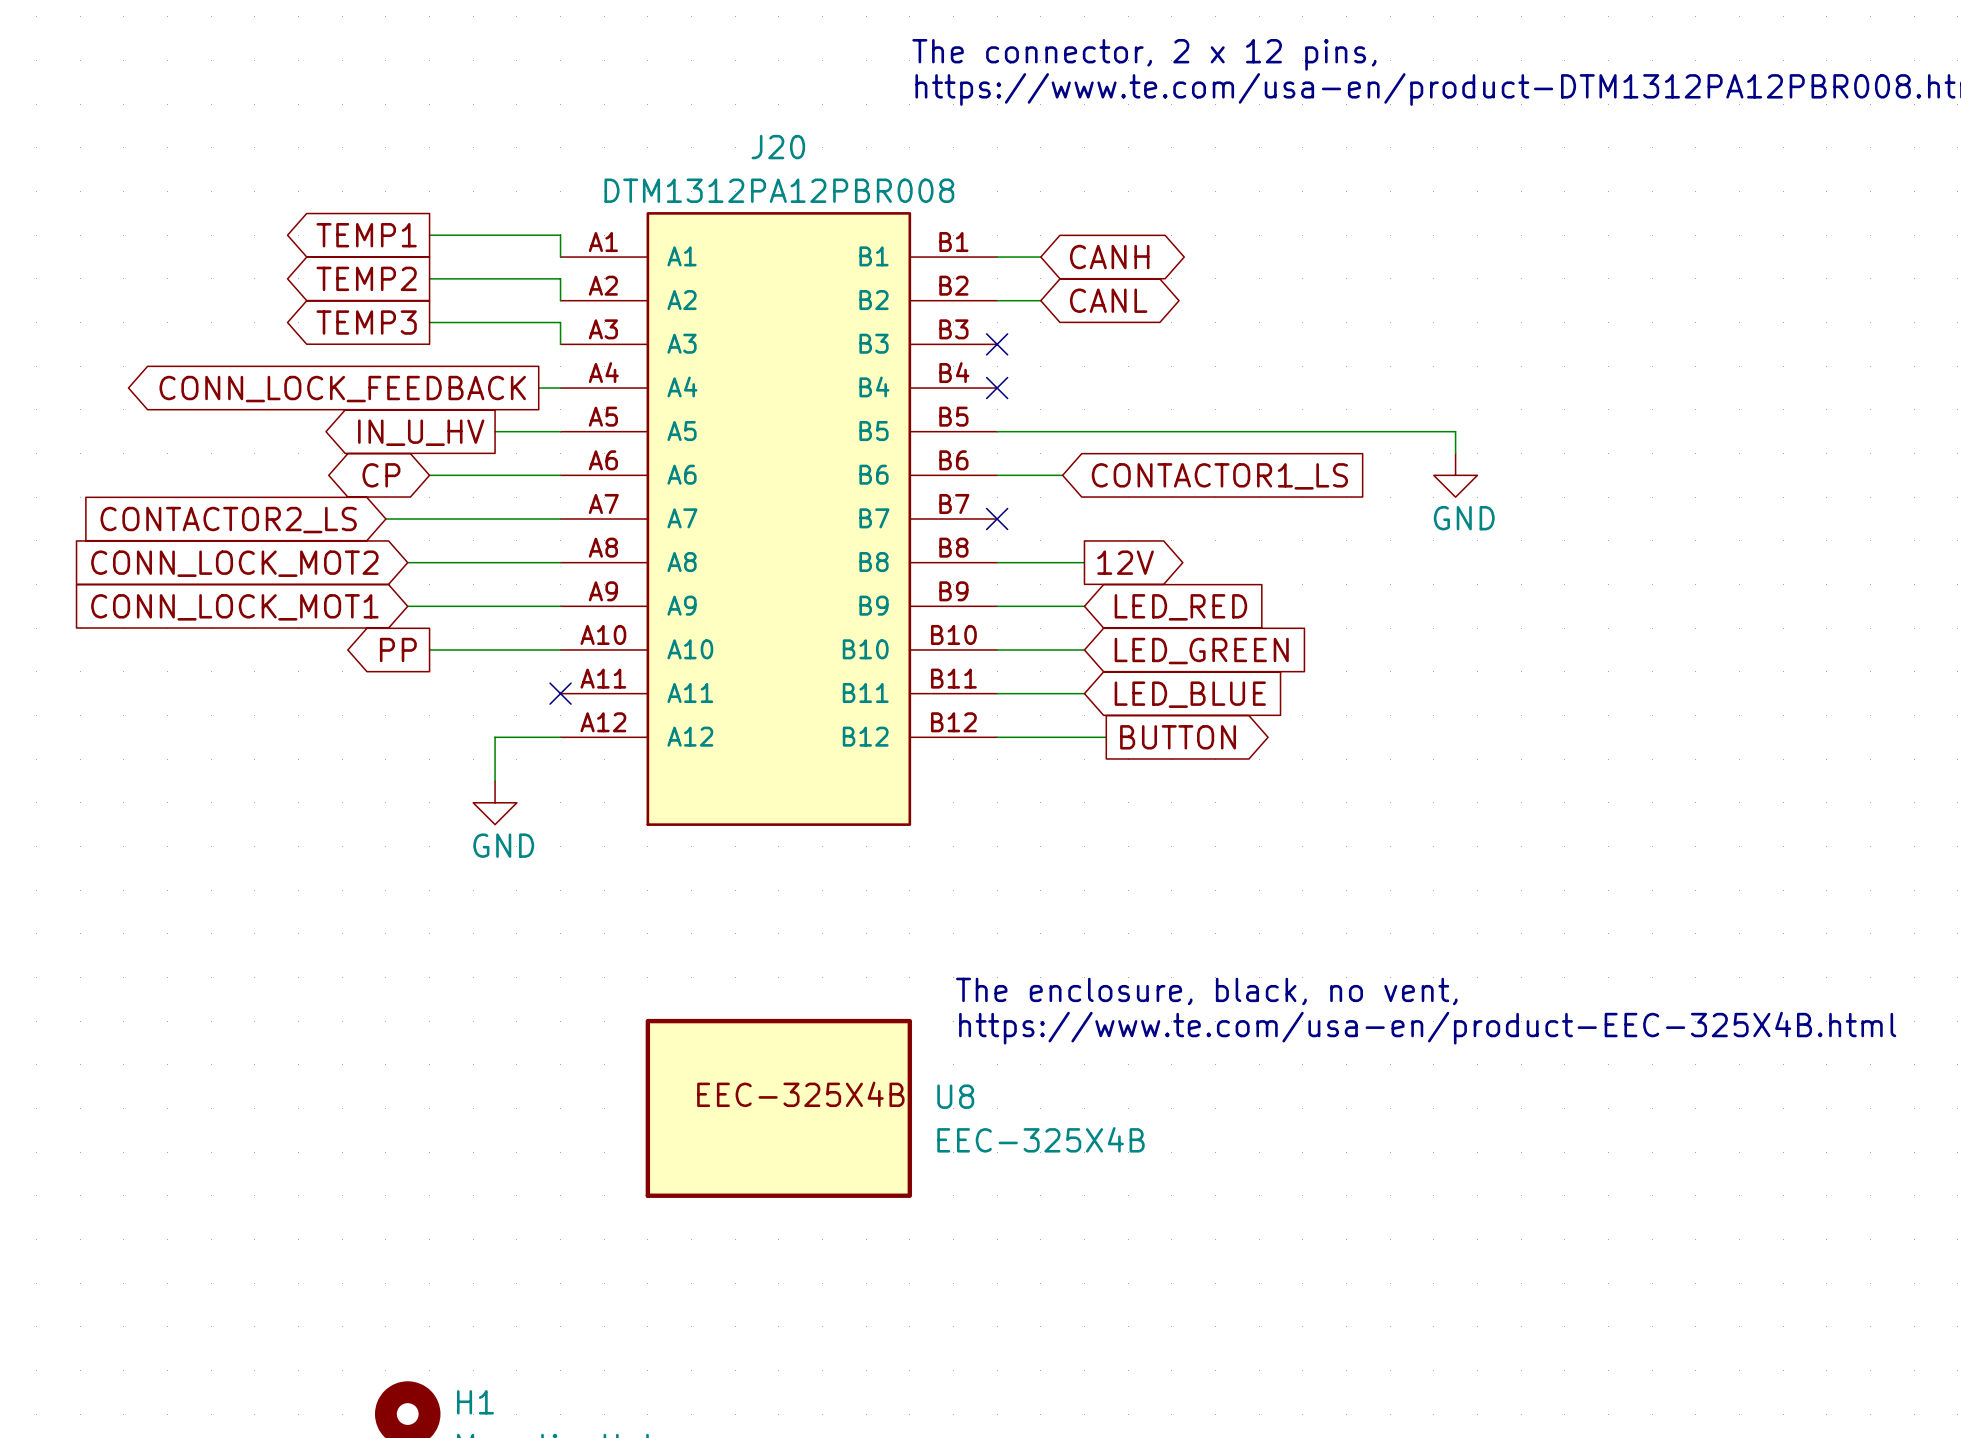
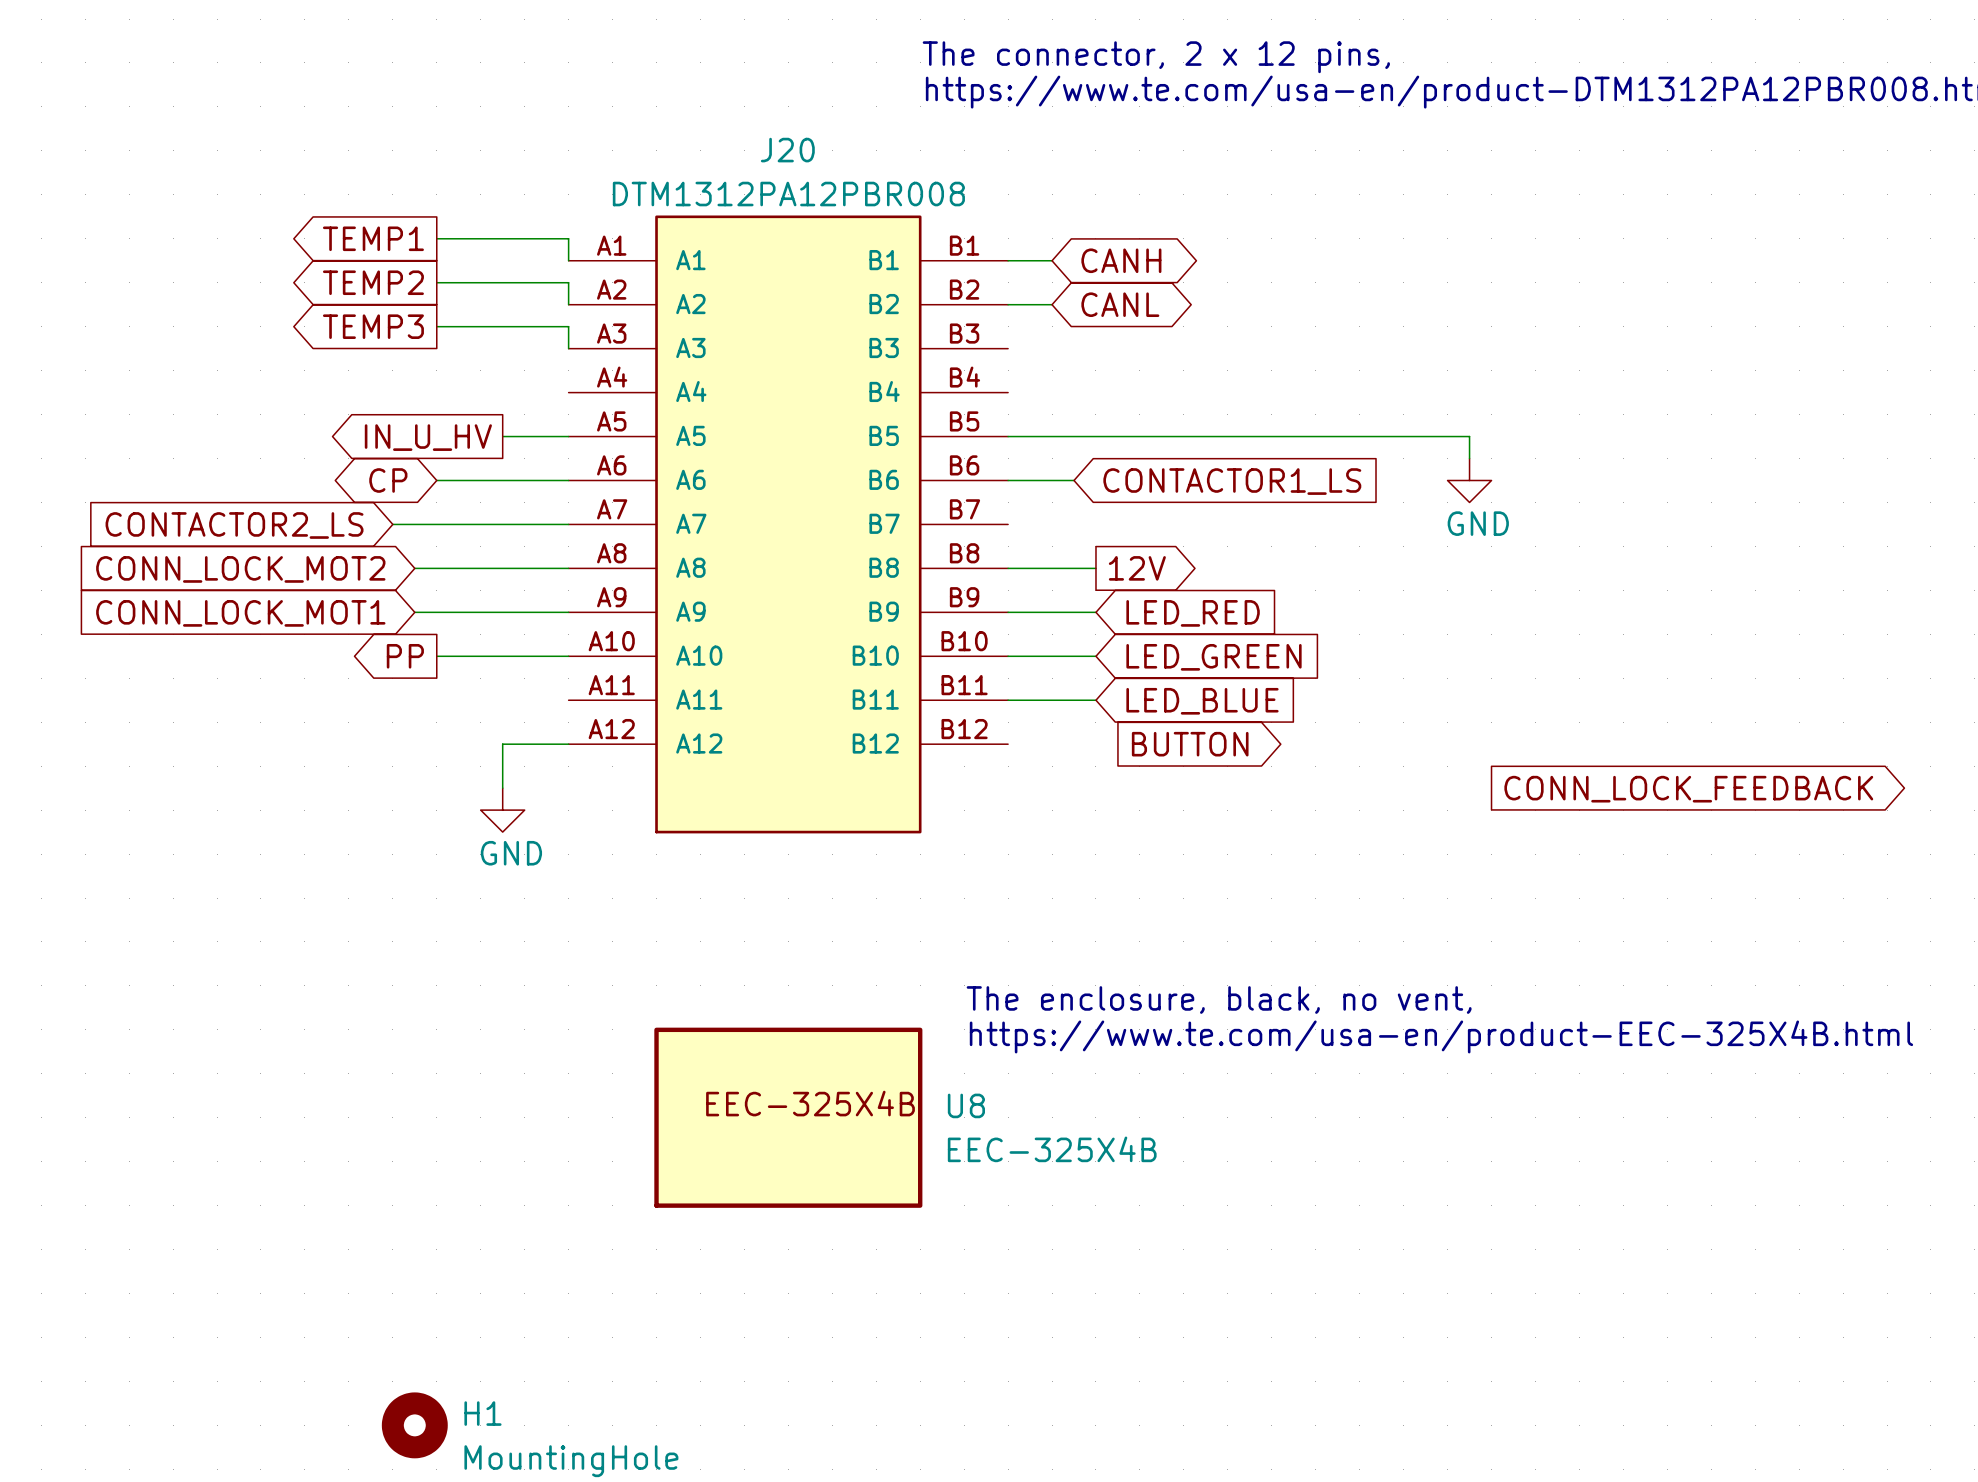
no-connect mark: (997, 344) -> none
wire: (538, 388) (560, 388) -> none
no-connect mark: (997, 388) -> none
global label: CONN_LOCK_FEEDBACK (342, 389) -> none
no-connect mark: (997, 519) -> none
no-connect mark: (560, 693) -> none
wire: (997, 737) (1106, 737) -> none
global label: none -> CONN_LOCK_FEEDBACK (1688, 789)

